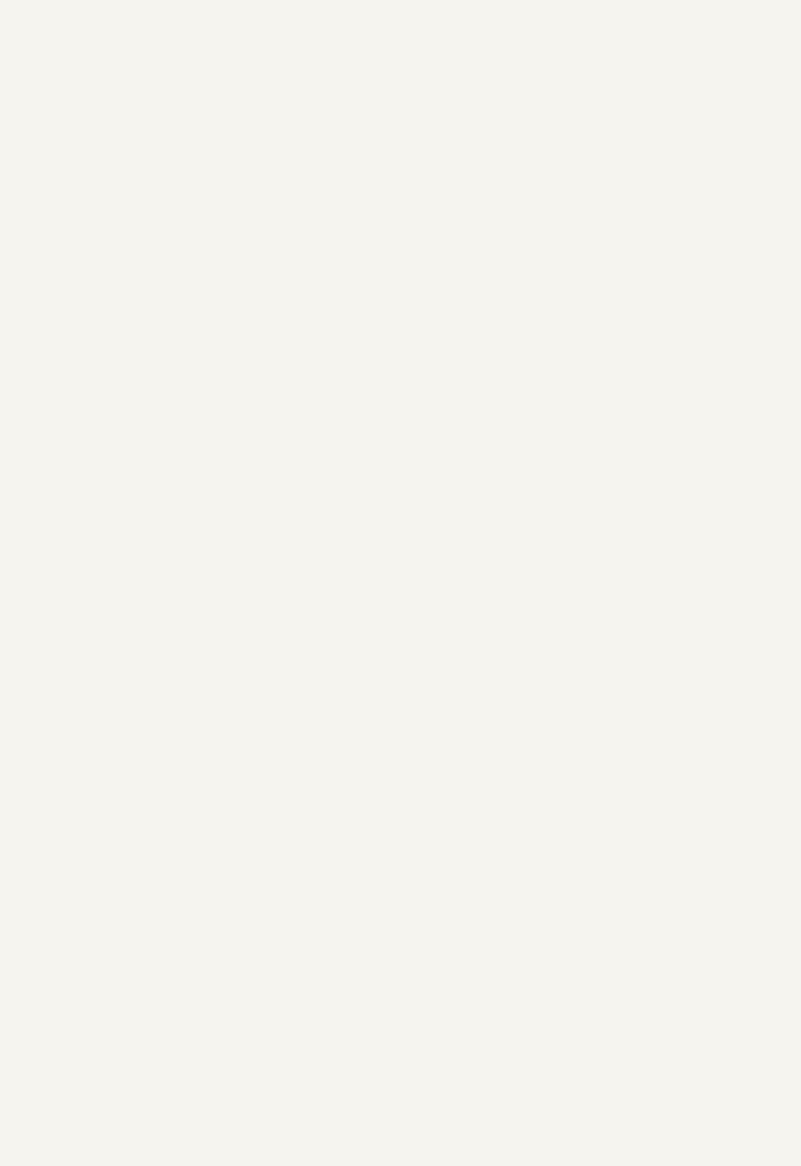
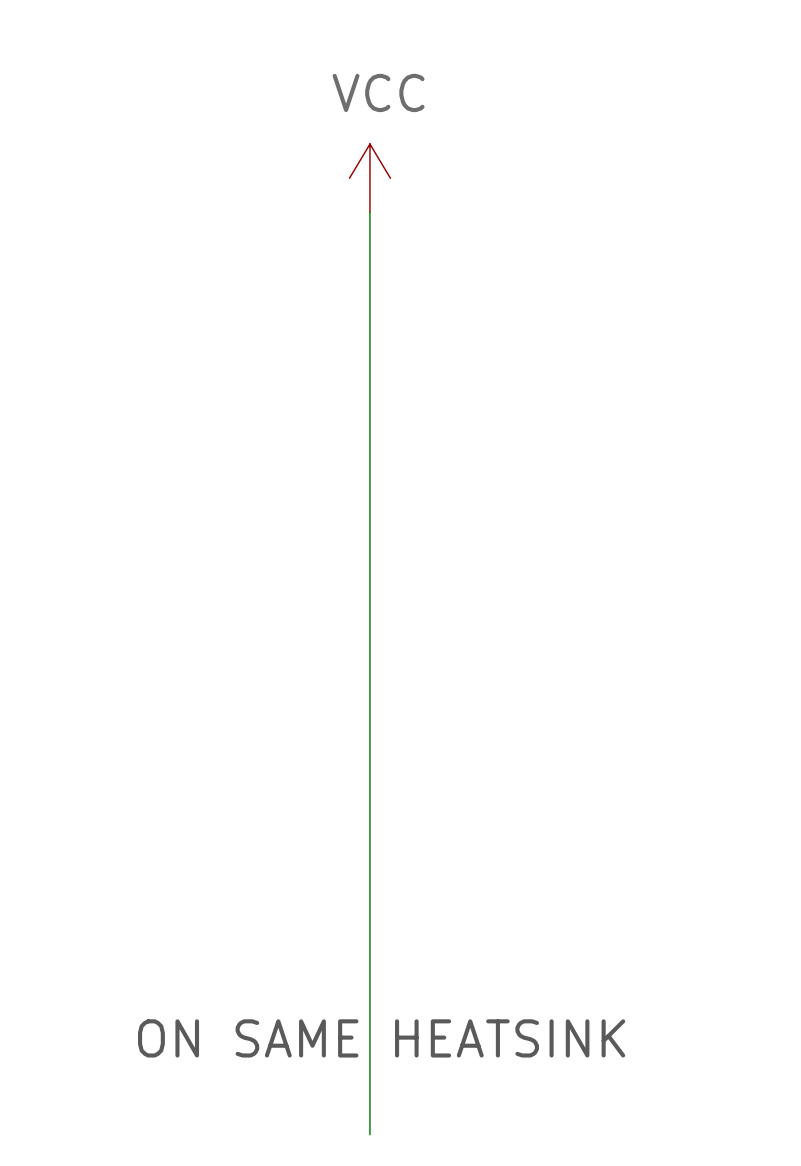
power symbol: none -> VCC (369, 178)
wire: none -> (369, 212) (369, 1134)
text: none -> ON SAME HEATSINK (381, 1038)

